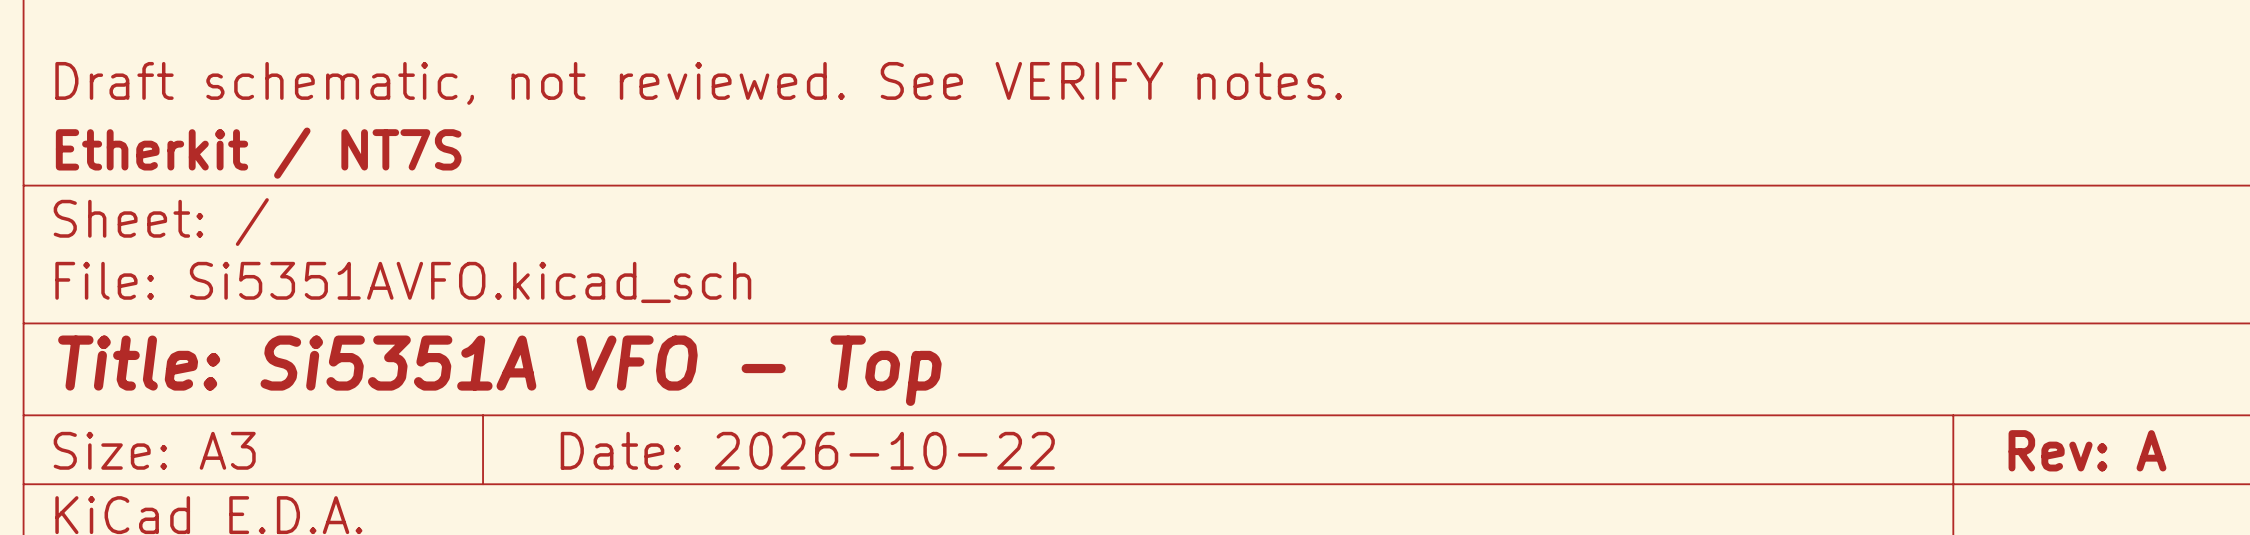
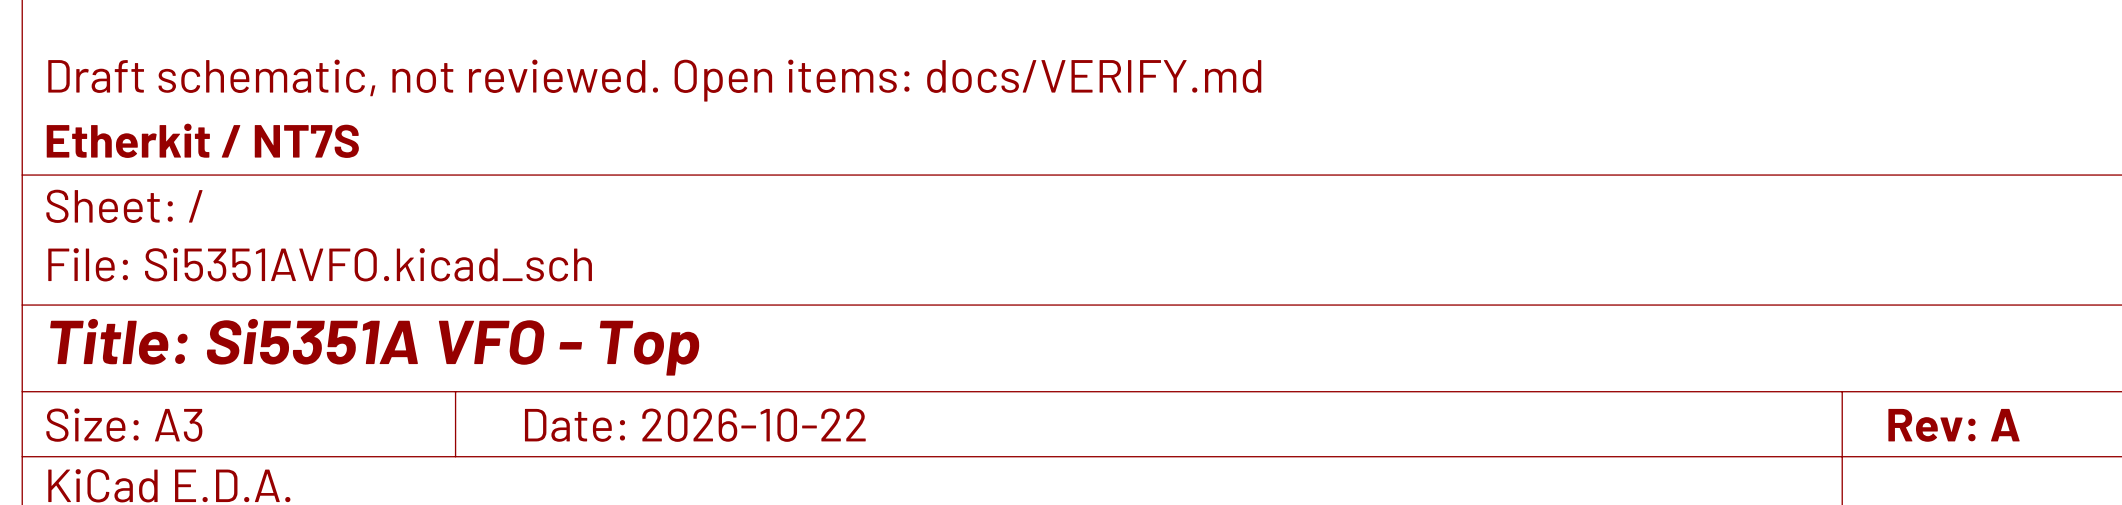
title block: Draft schematic, not reviewed. See VERIFY notes. (698, 83) -> Draft schematic, not reviewed. Open items: docs/VERIFY.md (654, 80)

